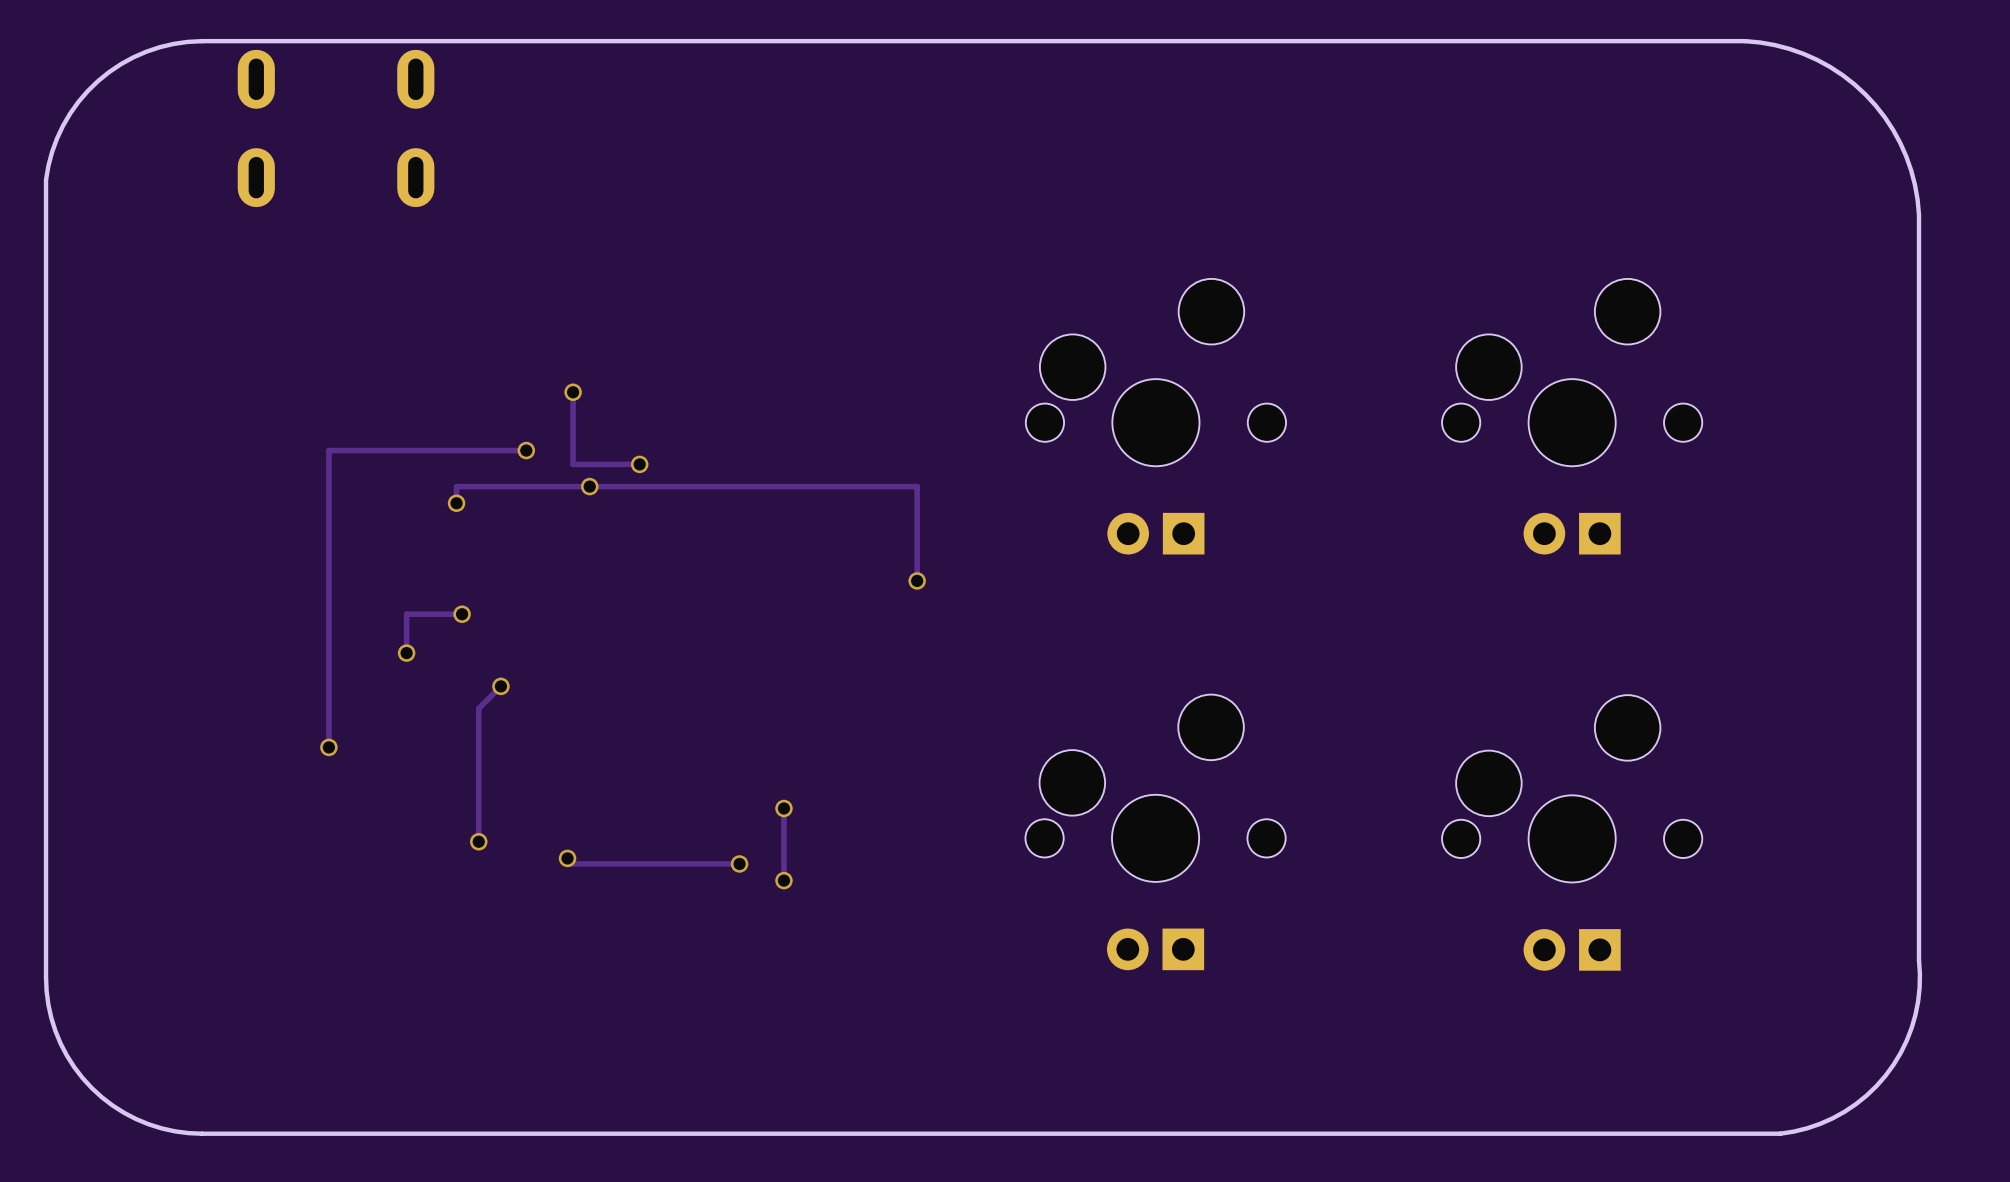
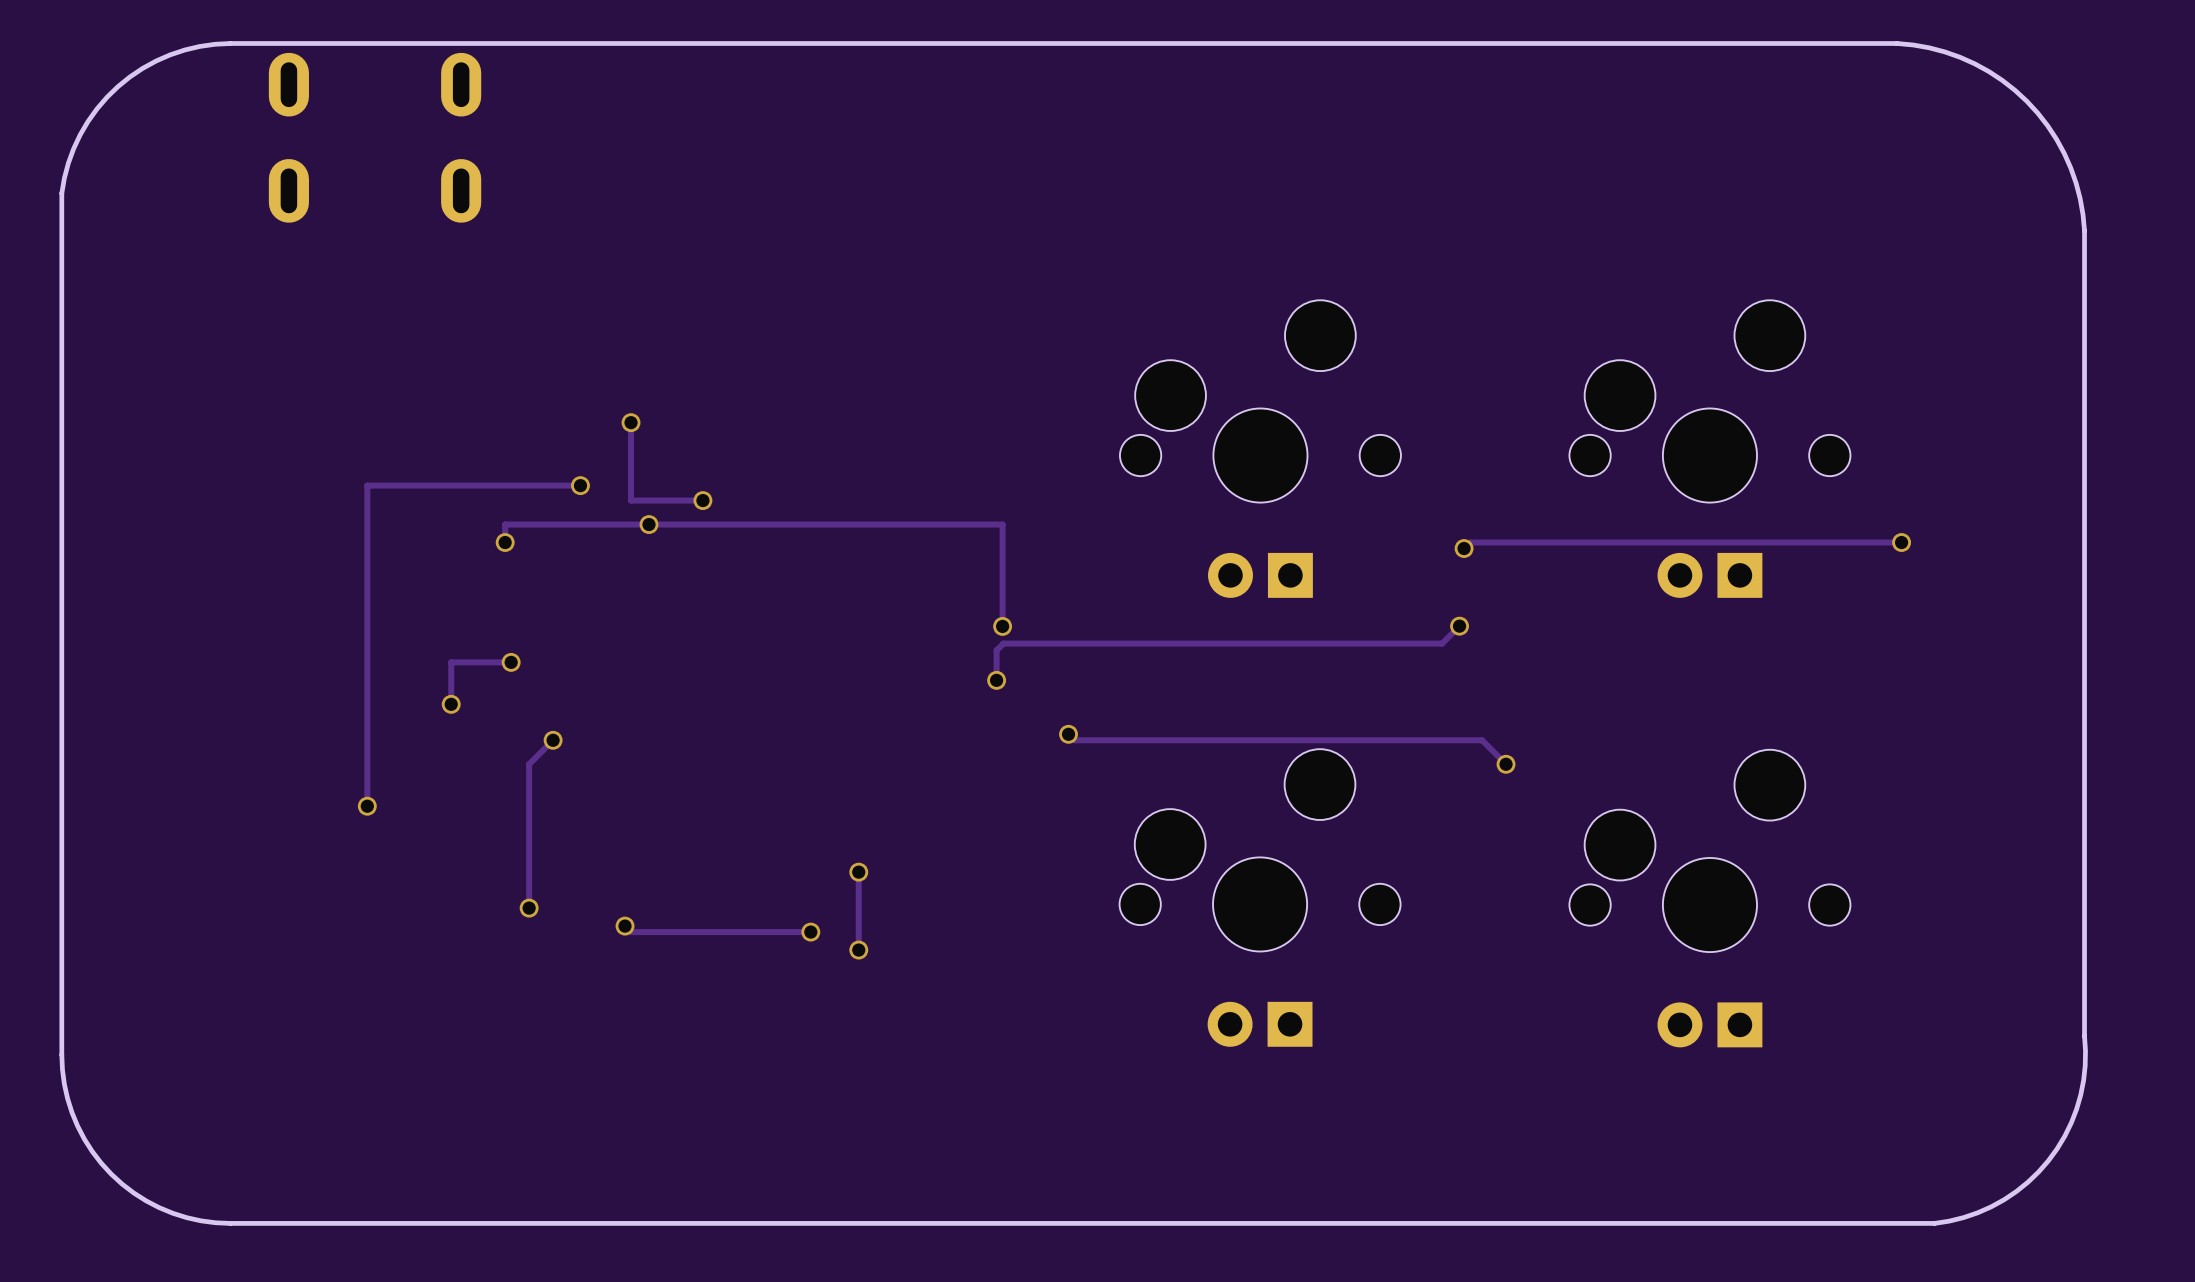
track: none -> (1901, 542) (1470, 542) (1464, 548)
via: none -> (1901, 542)
via: none -> (1464, 548)
track: none -> (1459, 626) (1442, 643) (1003, 643) (996, 650) (996, 680)
via: none -> (1459, 626)
via: none -> (996, 680)
track: none -> (1068, 734) (1074, 740) (1482, 740) (1506, 764)
via: none -> (1068, 734)
via: none -> (1506, 764)

